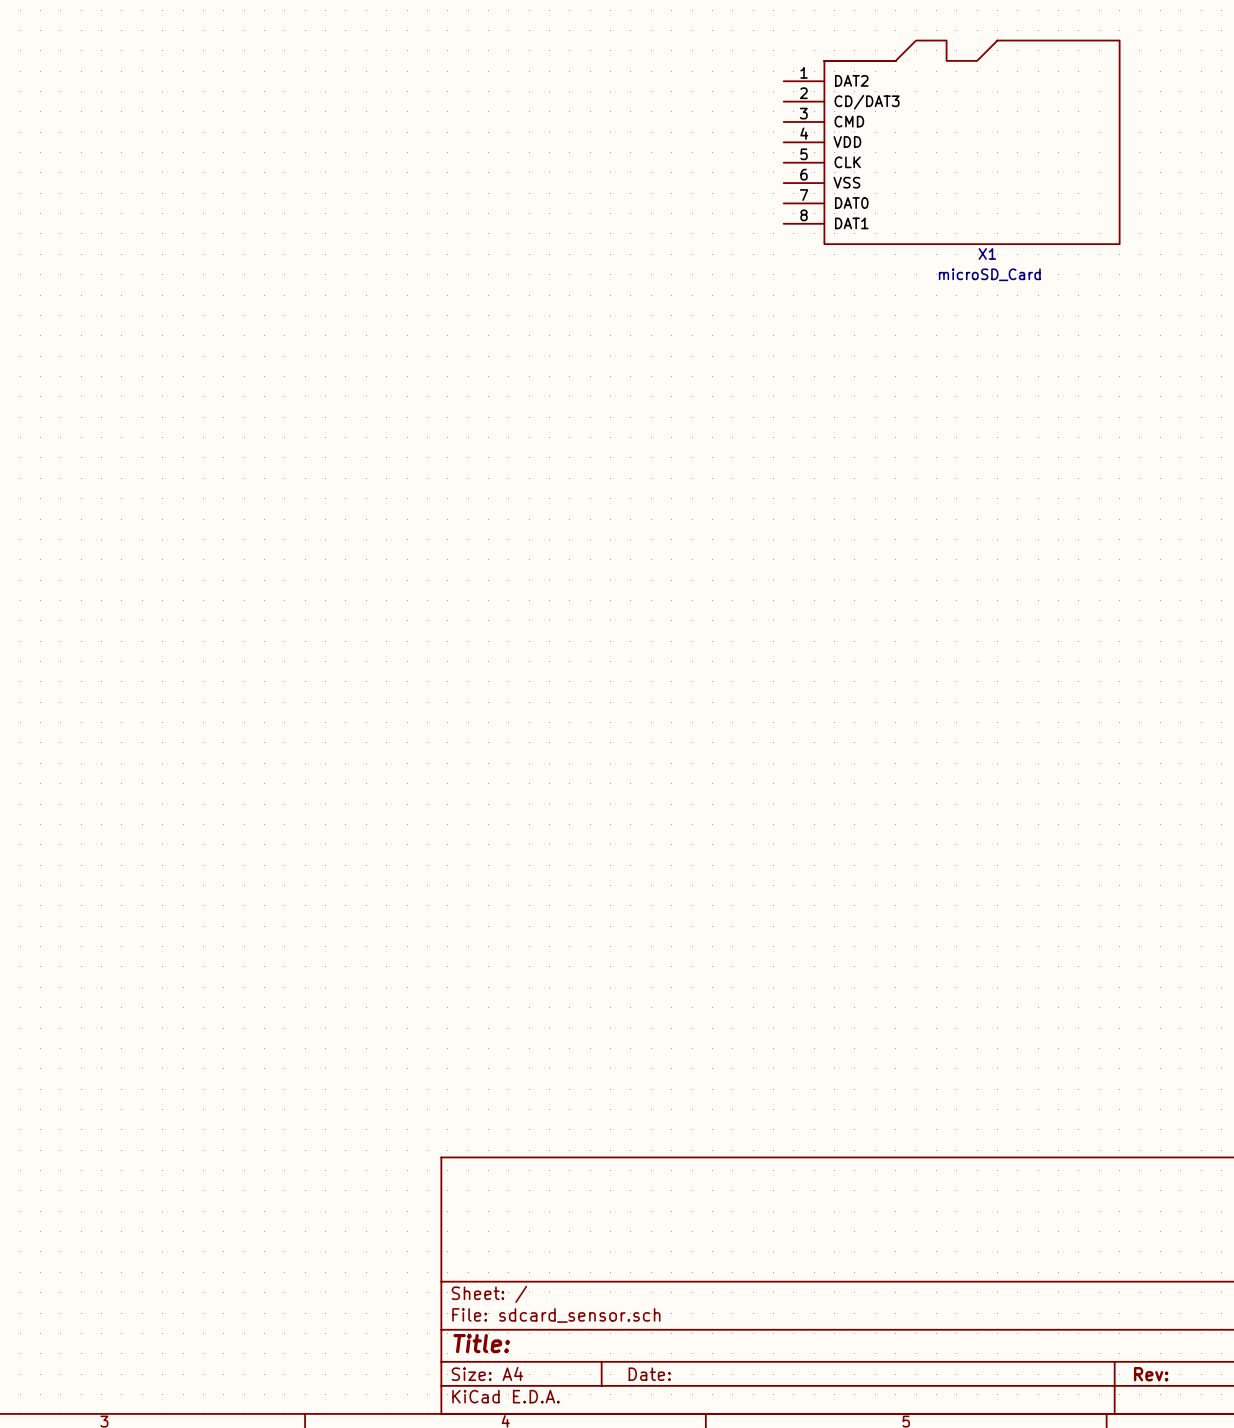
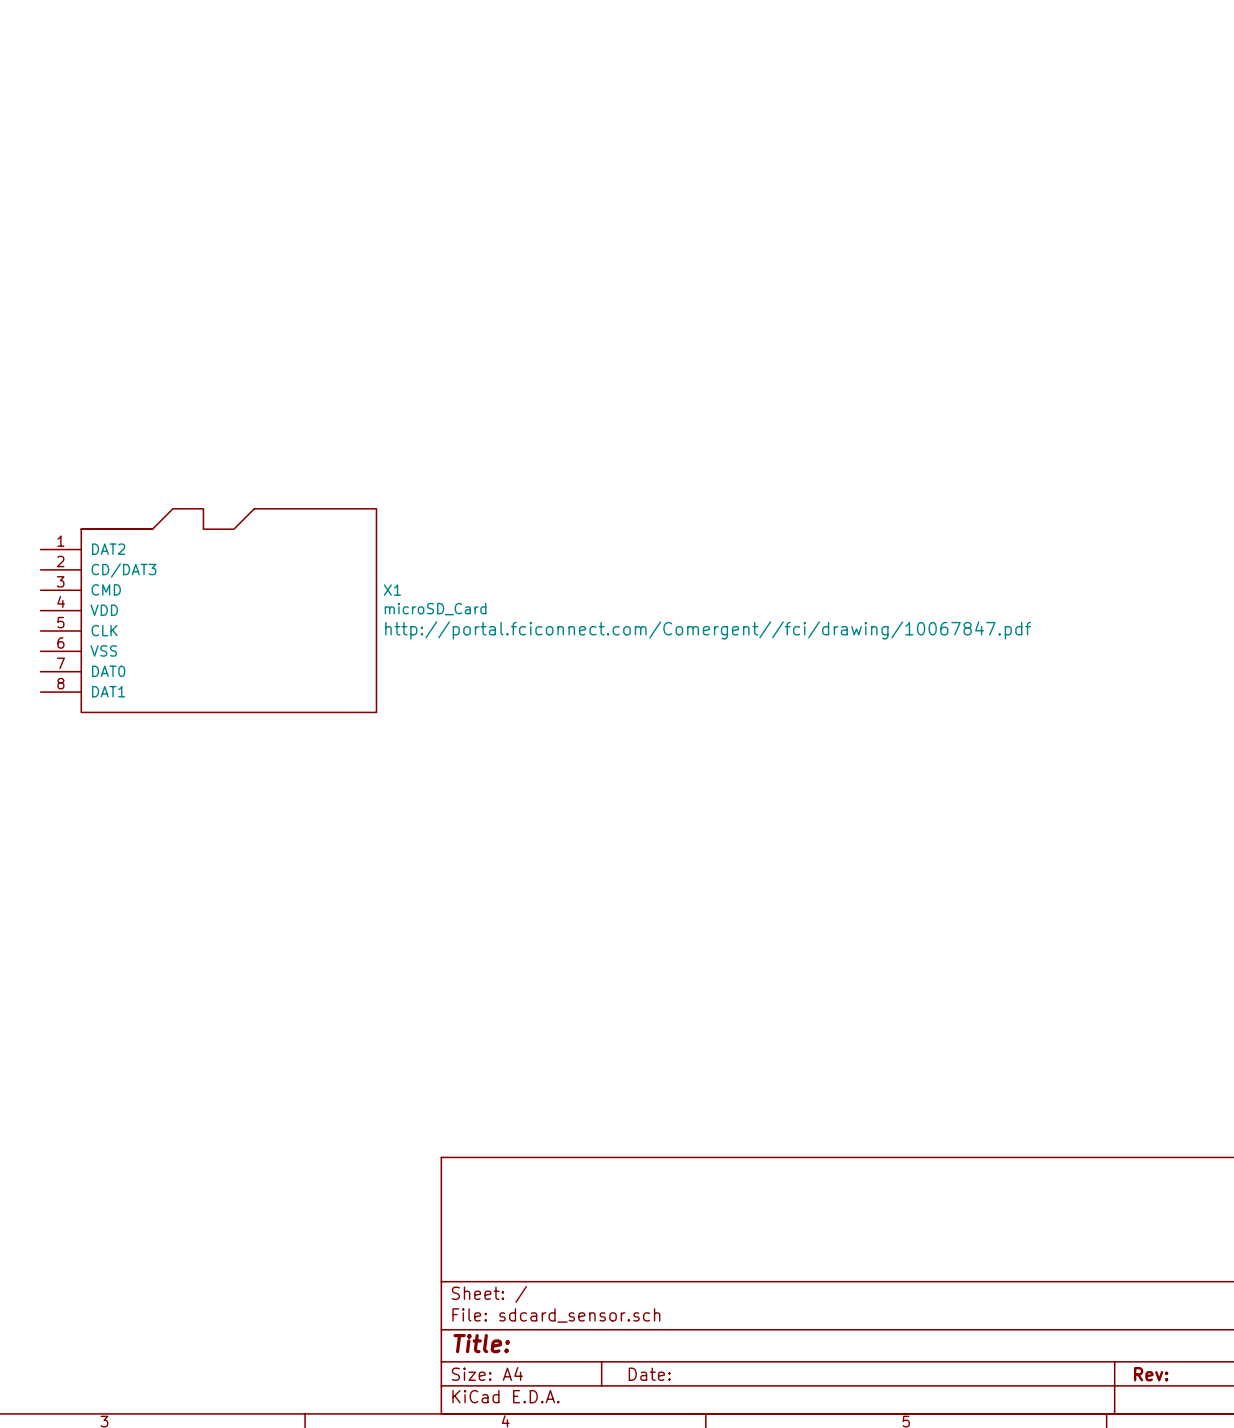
X1 position: (951, 142) -> (208, 610)
X1 name position: X1 (987, 253) -> X1 (392, 590)
X1 value position: microSD_Card (989, 274) -> microSD_Card (435, 609)
X1 text: none -> http://portal.fciconnect.com/Comergent//fci/drawing/10067847.pdf (708, 630)

